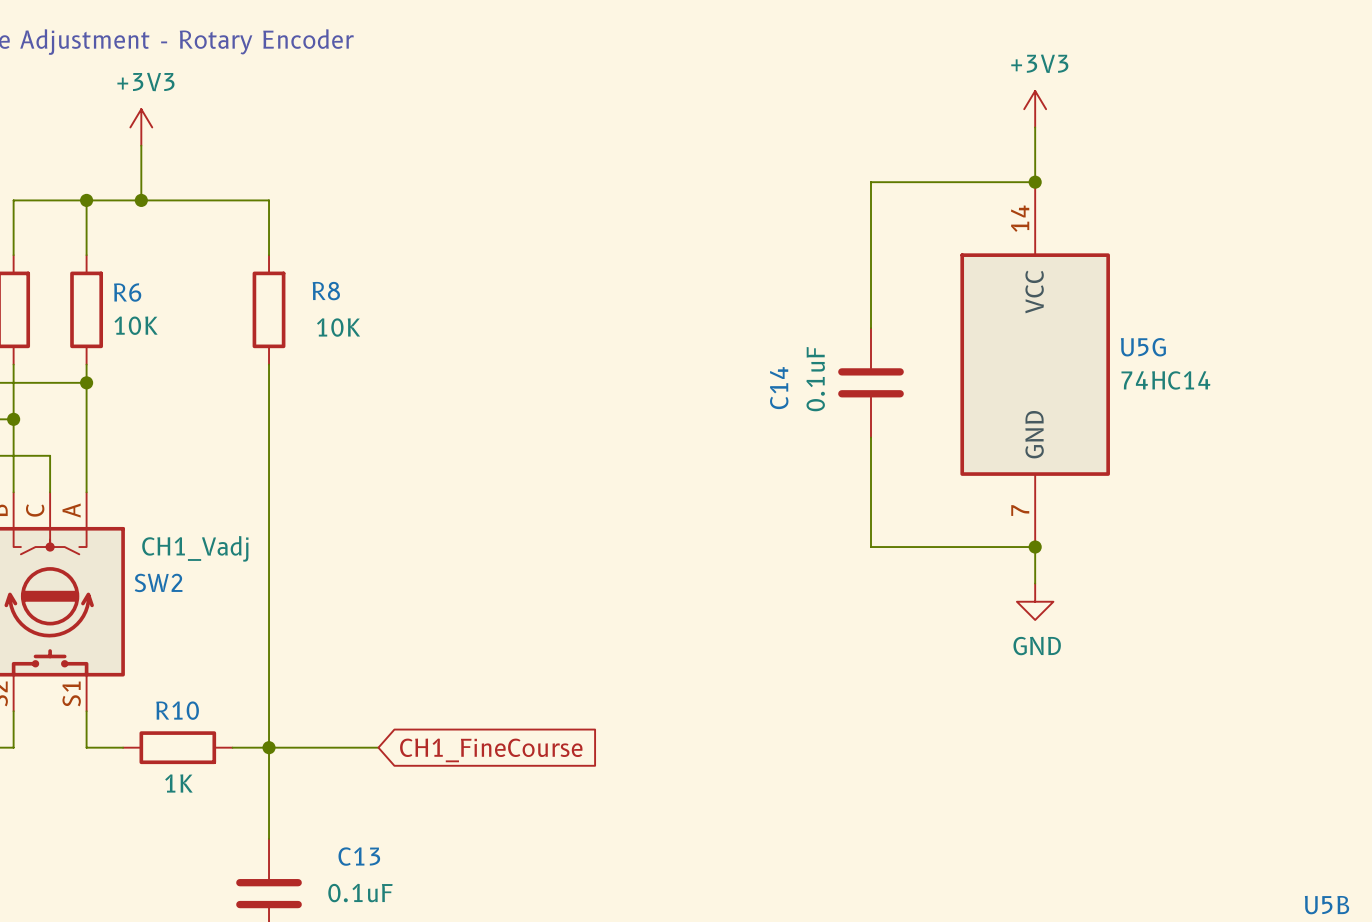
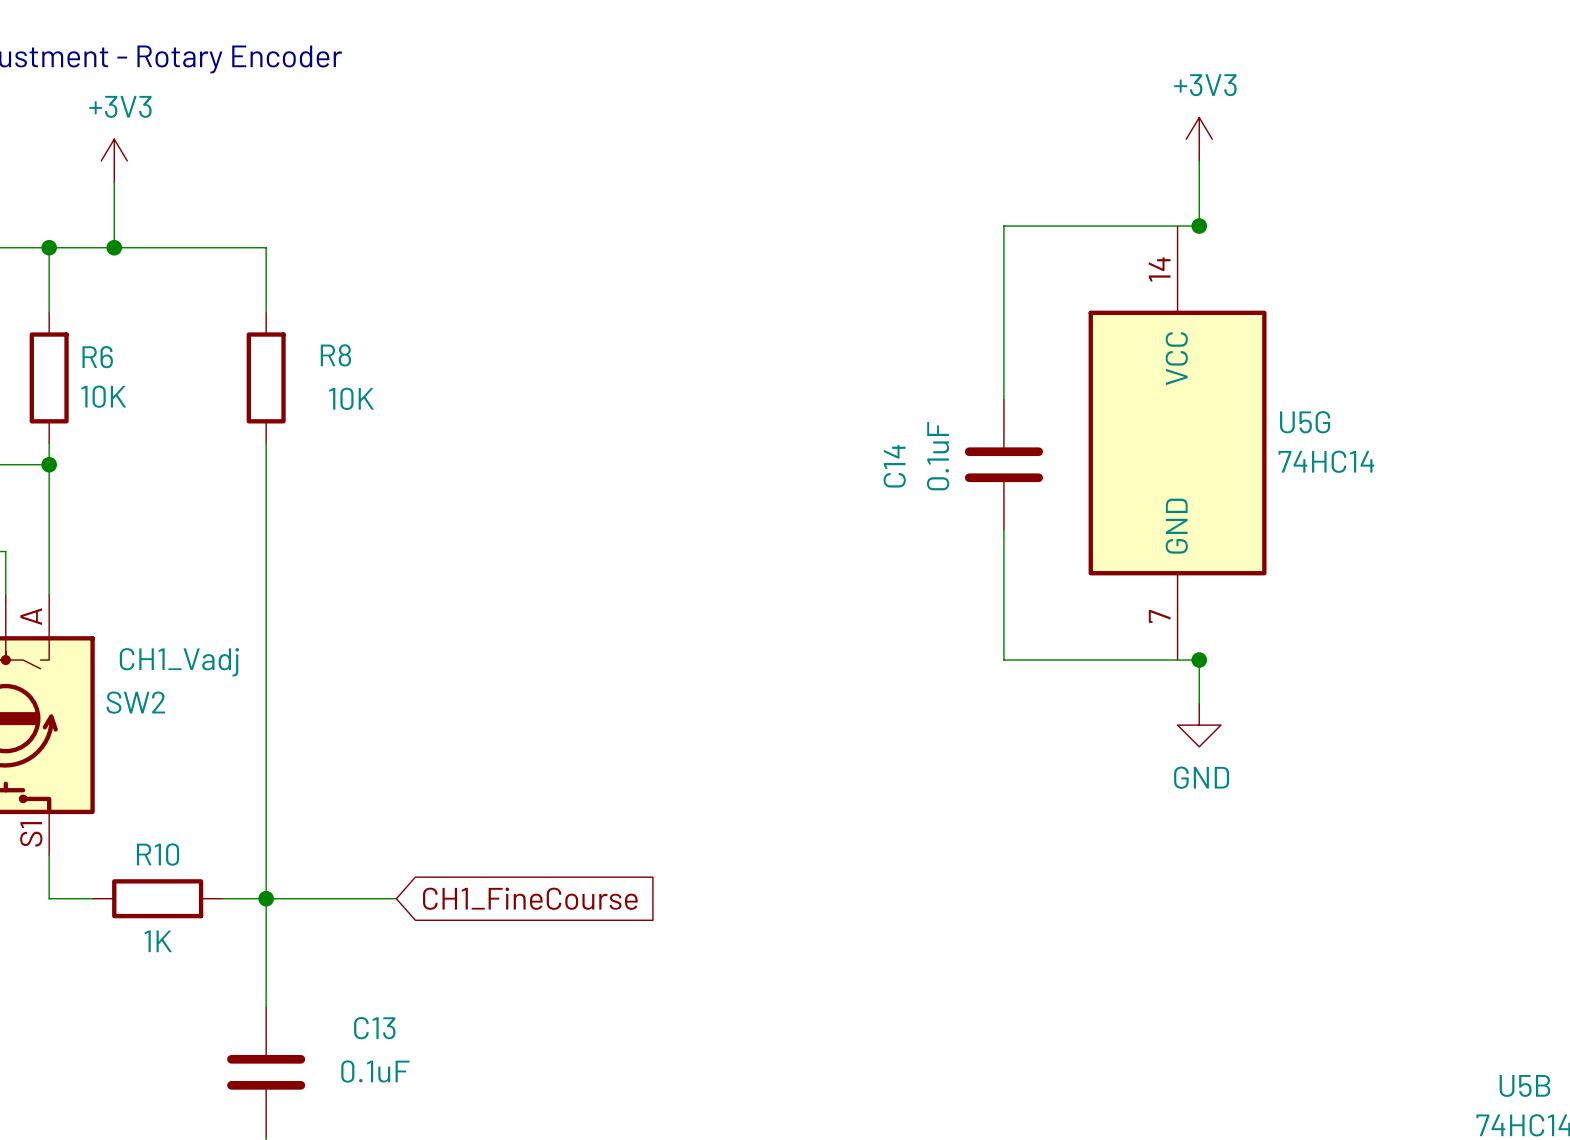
power symbol position: +3V3 (1035, 109) -> +3V3 (1199, 139)
wire: (1035, 127) (1035, 182) -> (1199, 160) (1199, 226) (1177, 226)
wire: (889, 182) (871, 182) (871, 328) -> (1003, 226) (1003, 399)
junction position: (1035, 182) -> (1199, 226)
C14 position: (871, 382) -> (1003, 464)
wire: (871, 437) (871, 547) (889, 547) -> (1003, 529) (1003, 660)
wire: (1035, 547) (1035, 583) -> (1177, 660) (1199, 660) (1199, 703)
junction position: (1035, 547) -> (1199, 660)
power symbol position: GND (1035, 601) -> GND (1199, 725)

